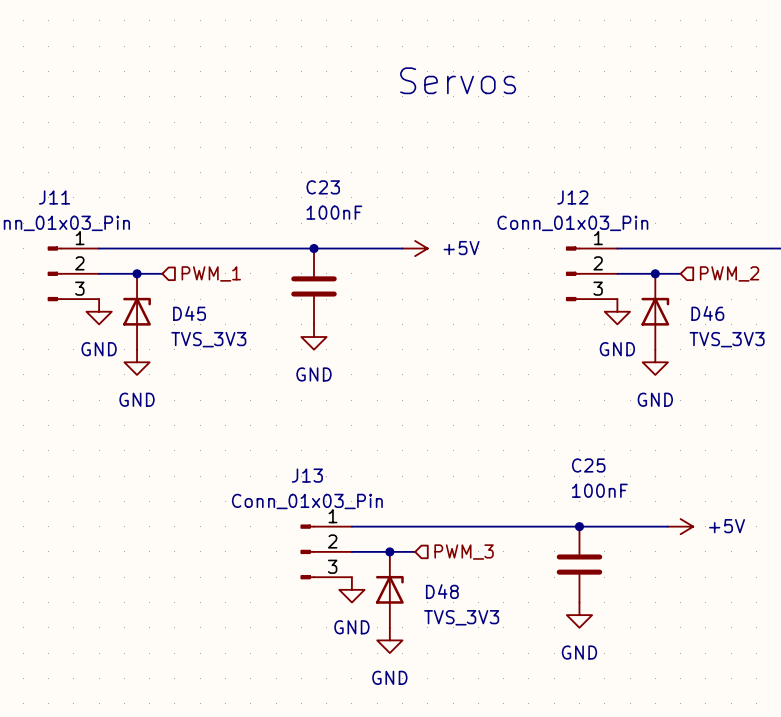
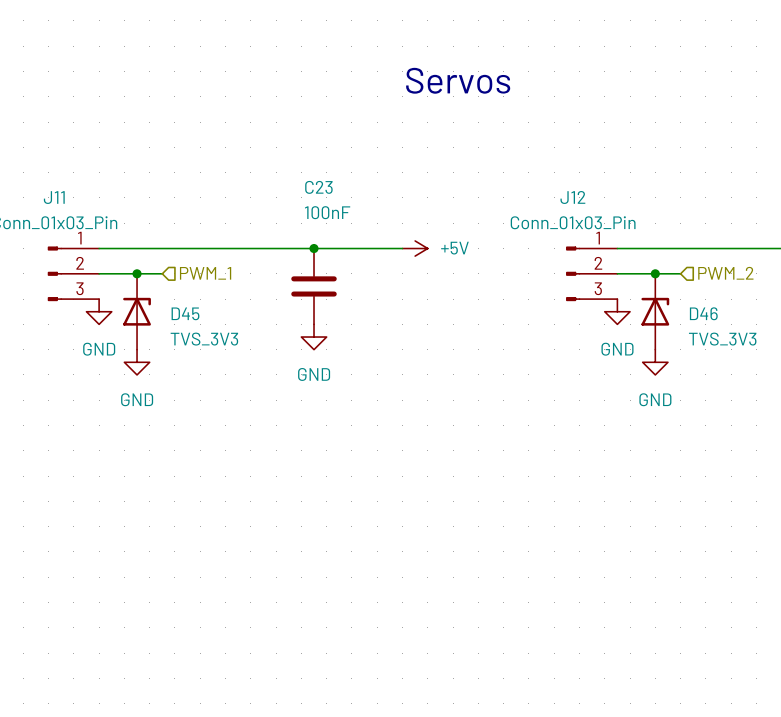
wire: (351, 526) (667, 526) -> none
junction: (579, 526) -> none
power symbol: +5V (680, 526) -> none
J13: Conn_01x03_Pin (326, 551) -> none
wire: (351, 551) (415, 551) -> none
junction: (389, 551) -> none
hierarchical label: PWM_3 (464, 552) -> none
C25: 100nF (579, 564) -> none
power symbol: GND (351, 589) -> none
D48: TVS_3V3 (389, 589) -> none
power symbol: GND (579, 615) -> none
power symbol: GND (389, 640) -> none

